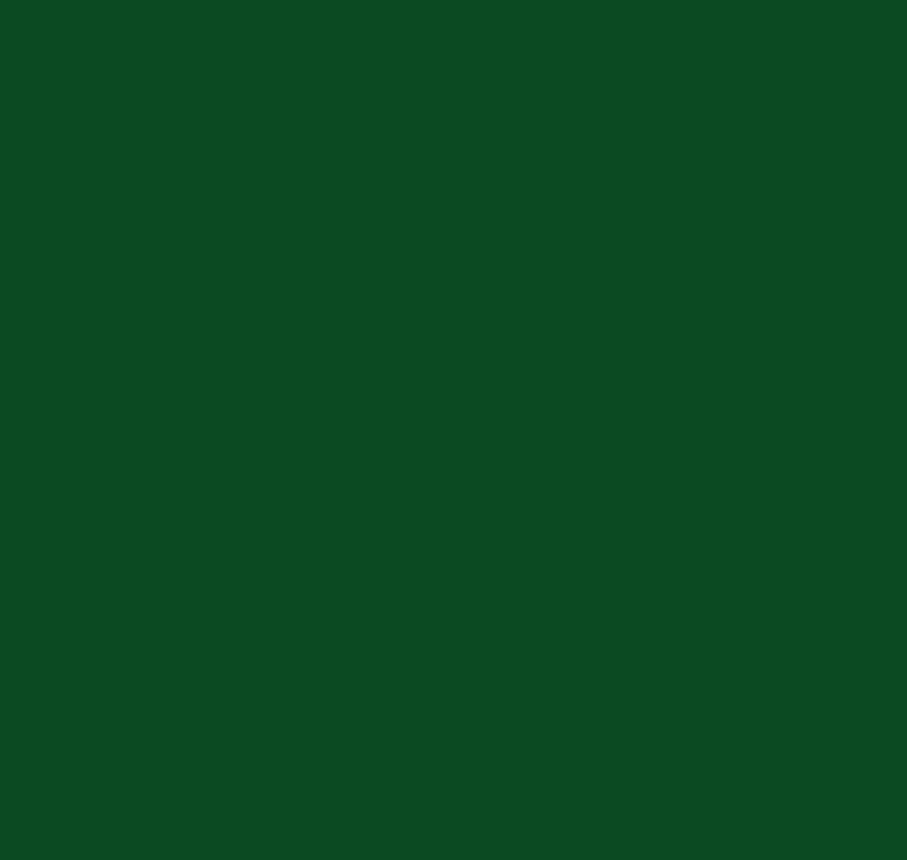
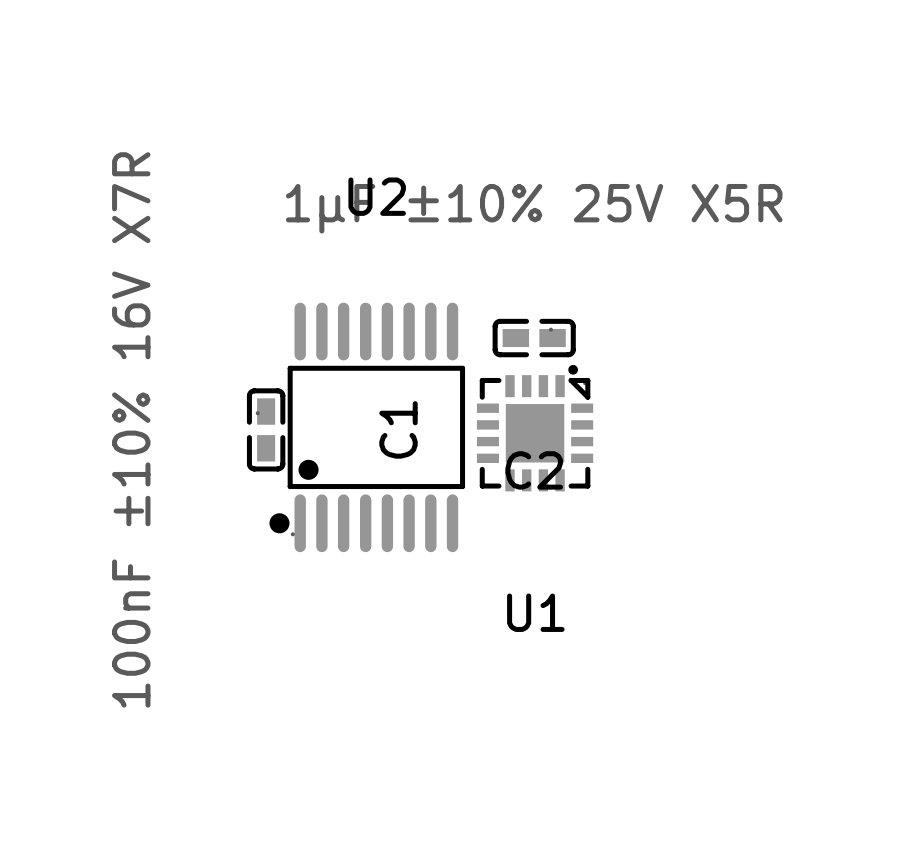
C2: none -> 1µF ±10% 25V X5R (534, 338)
U2: none -> (367, 427)
U1: none -> (535, 428)
C1: none -> 100nF ±10% 16V X7R (266, 429)

